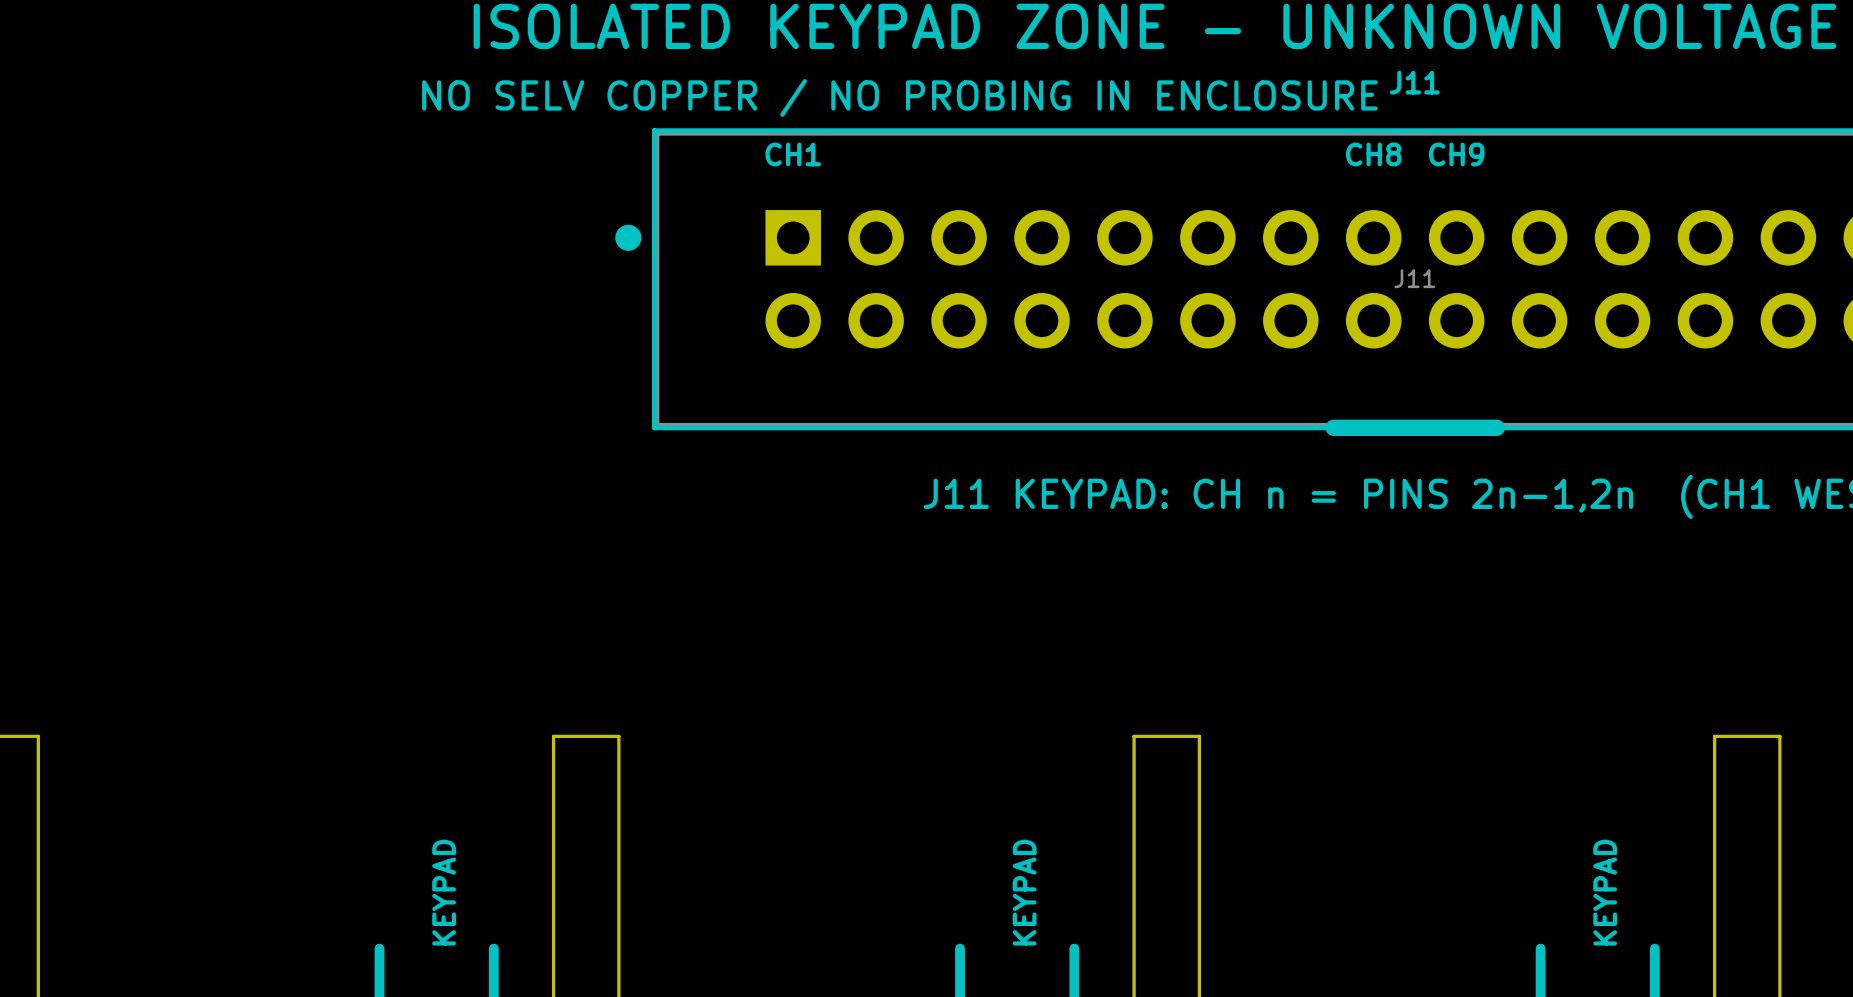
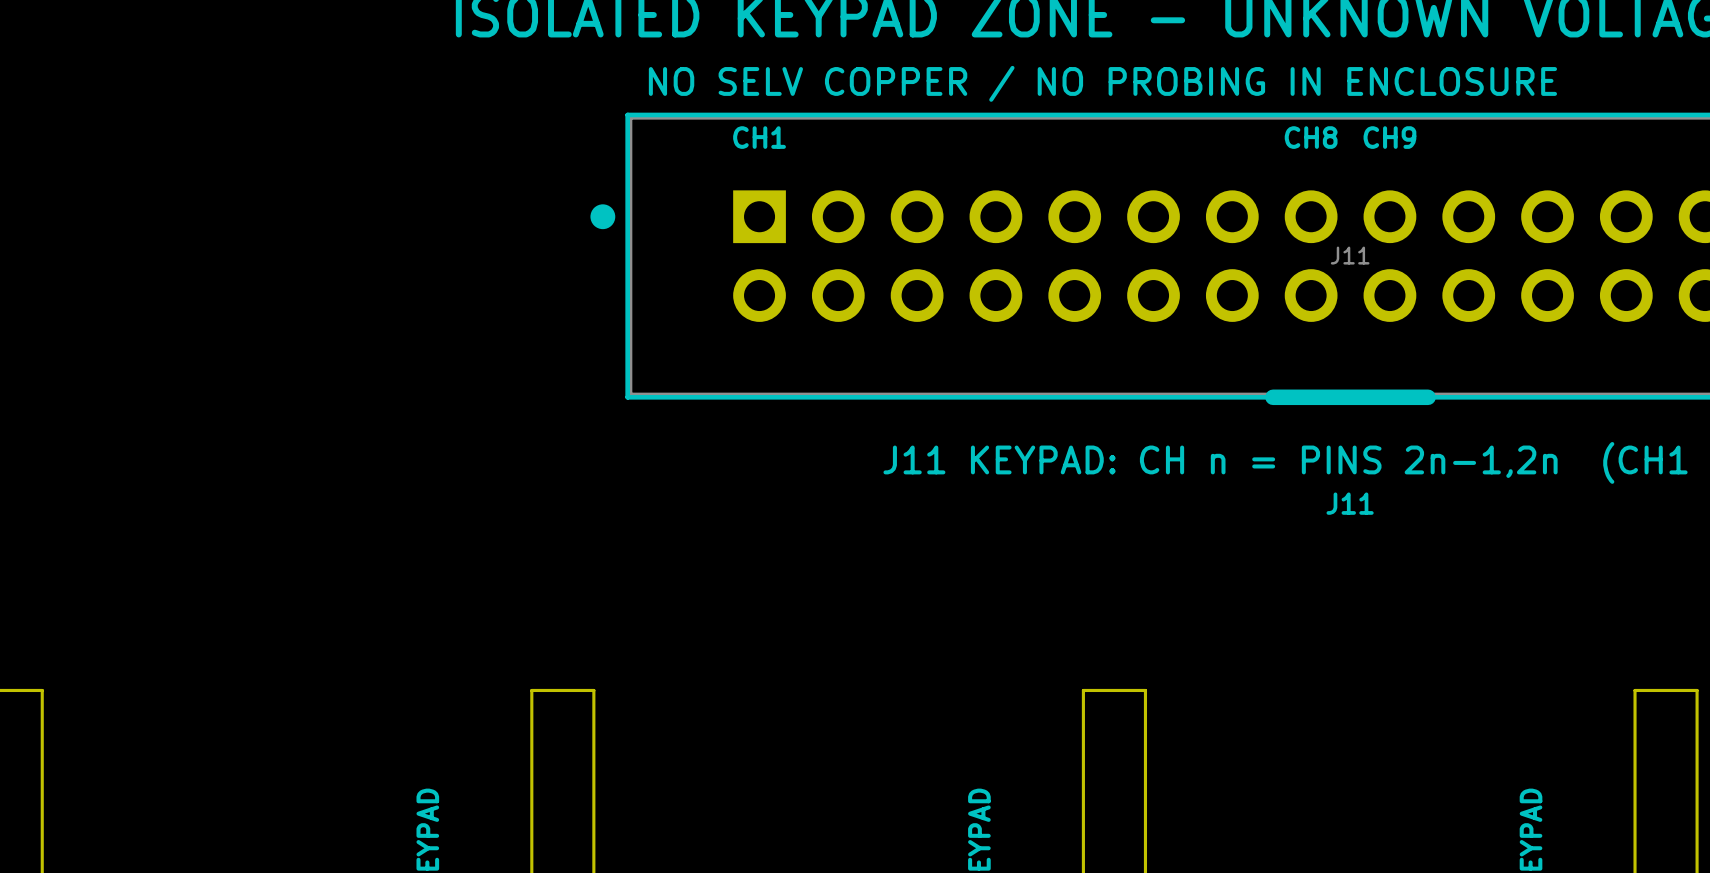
J11 name position: J11 (1414, 82) -> J11 (1350, 503)
text position: NO SELV COPPER / NO PROBING IN ENCLOSURE (899, 97) -> NO SELV COPPER / NO PROBING IN ENCLOSURE (1102, 83)

